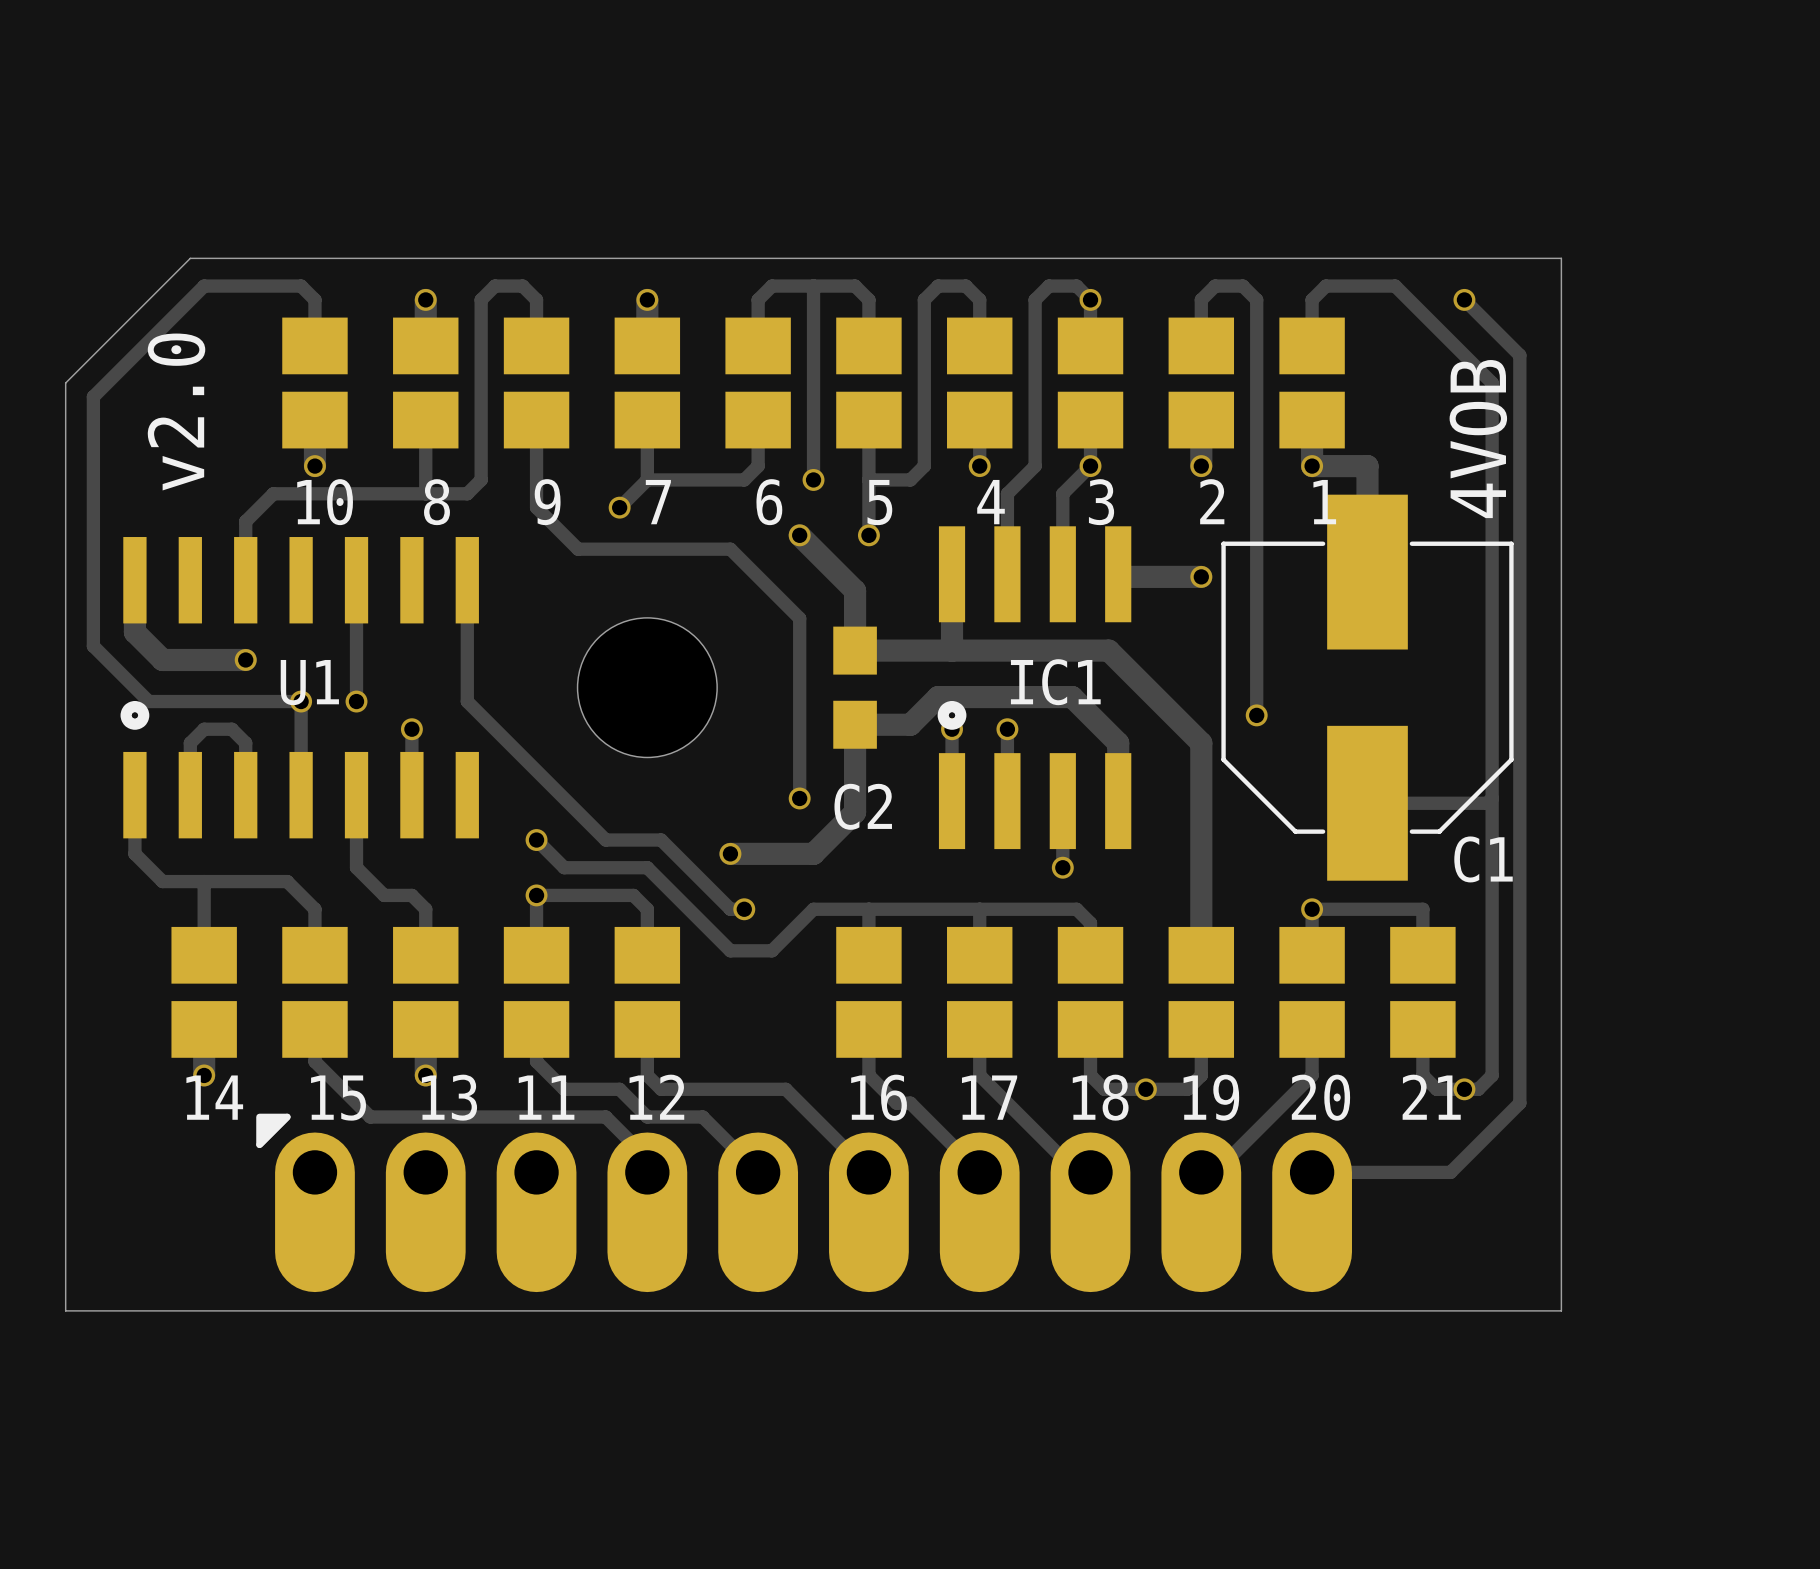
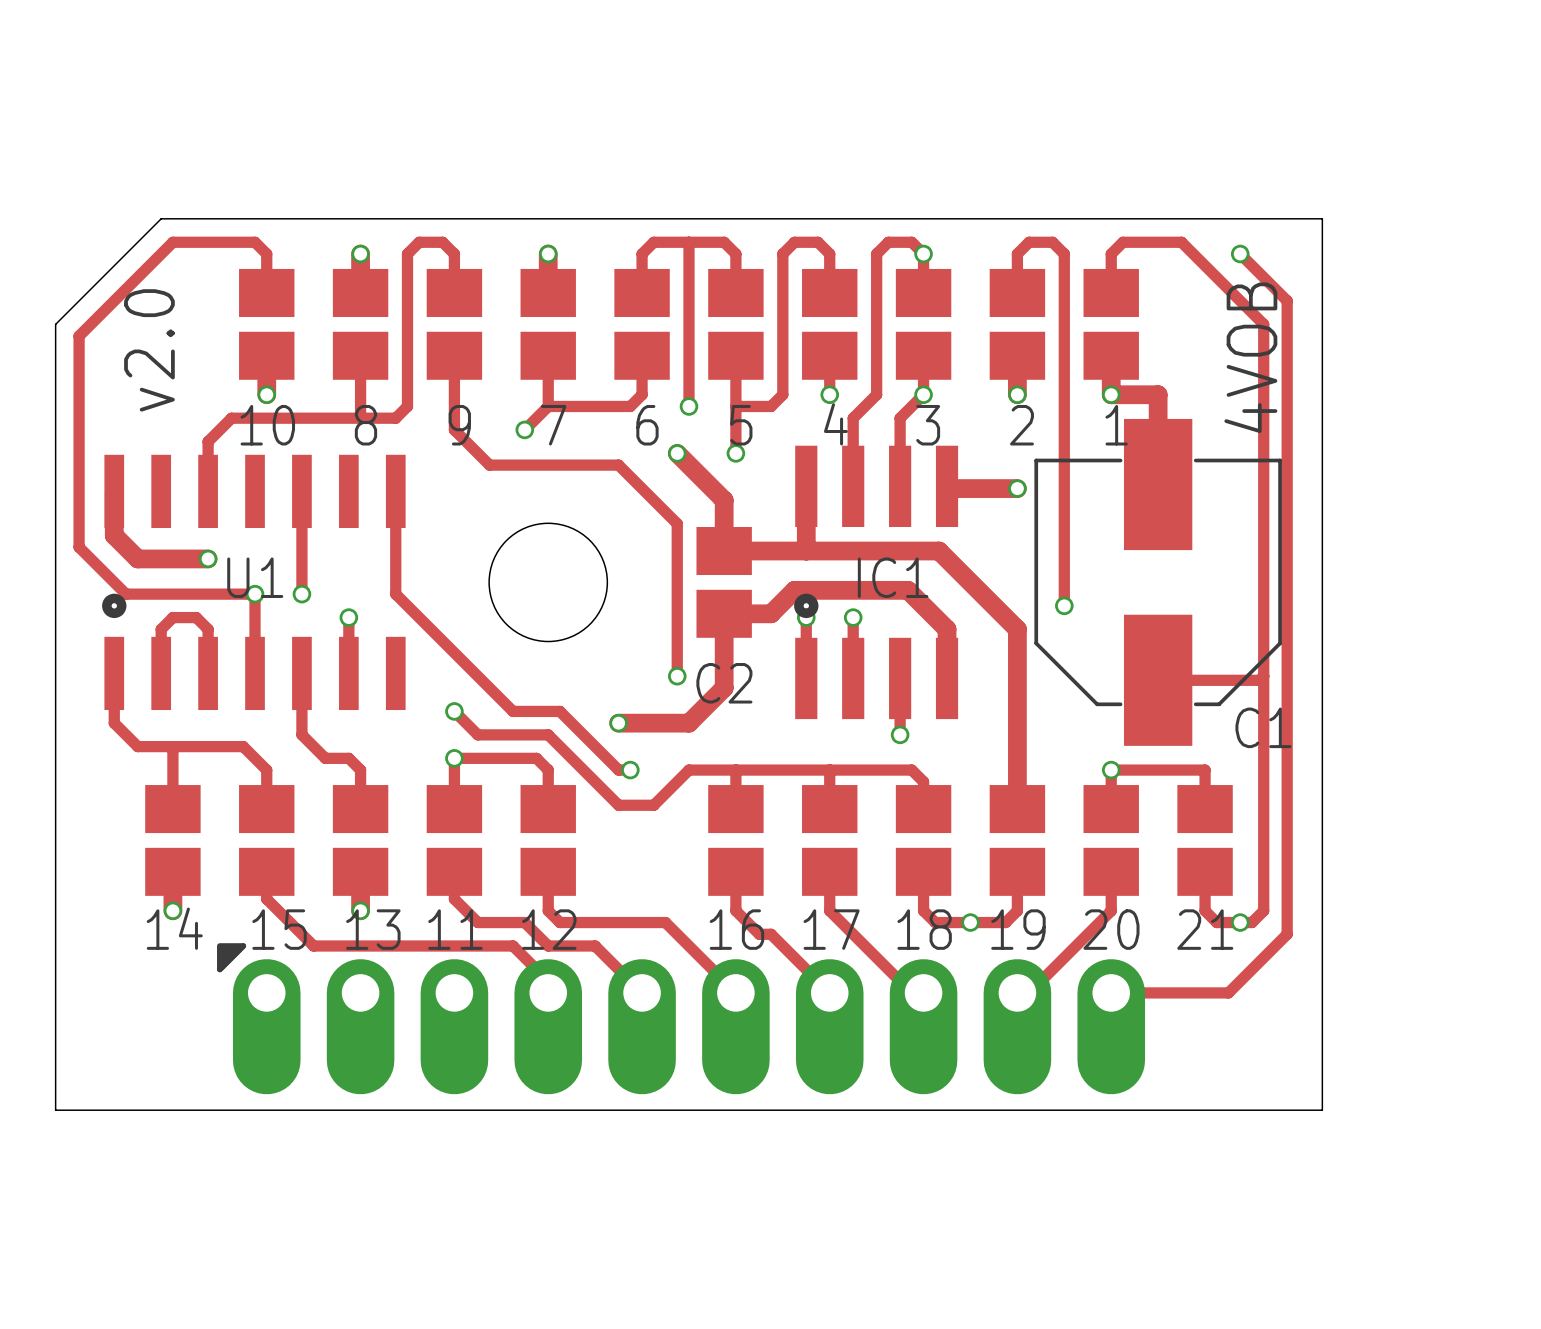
part footprint: [833, 626, 877, 749] -> [696, 526, 752, 638]

